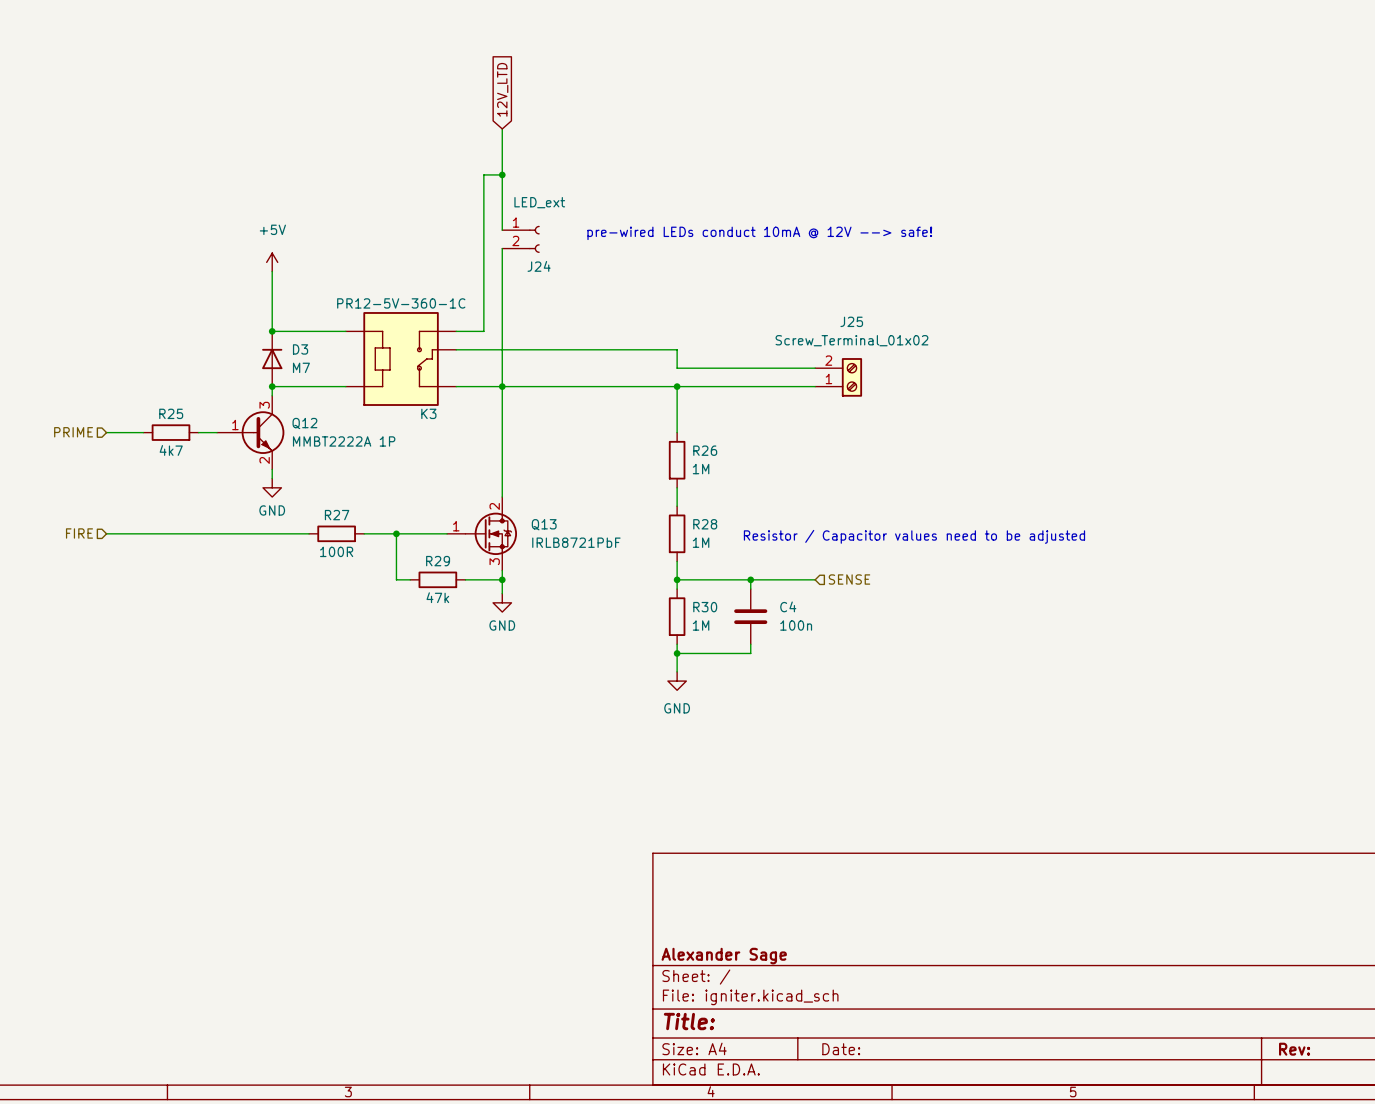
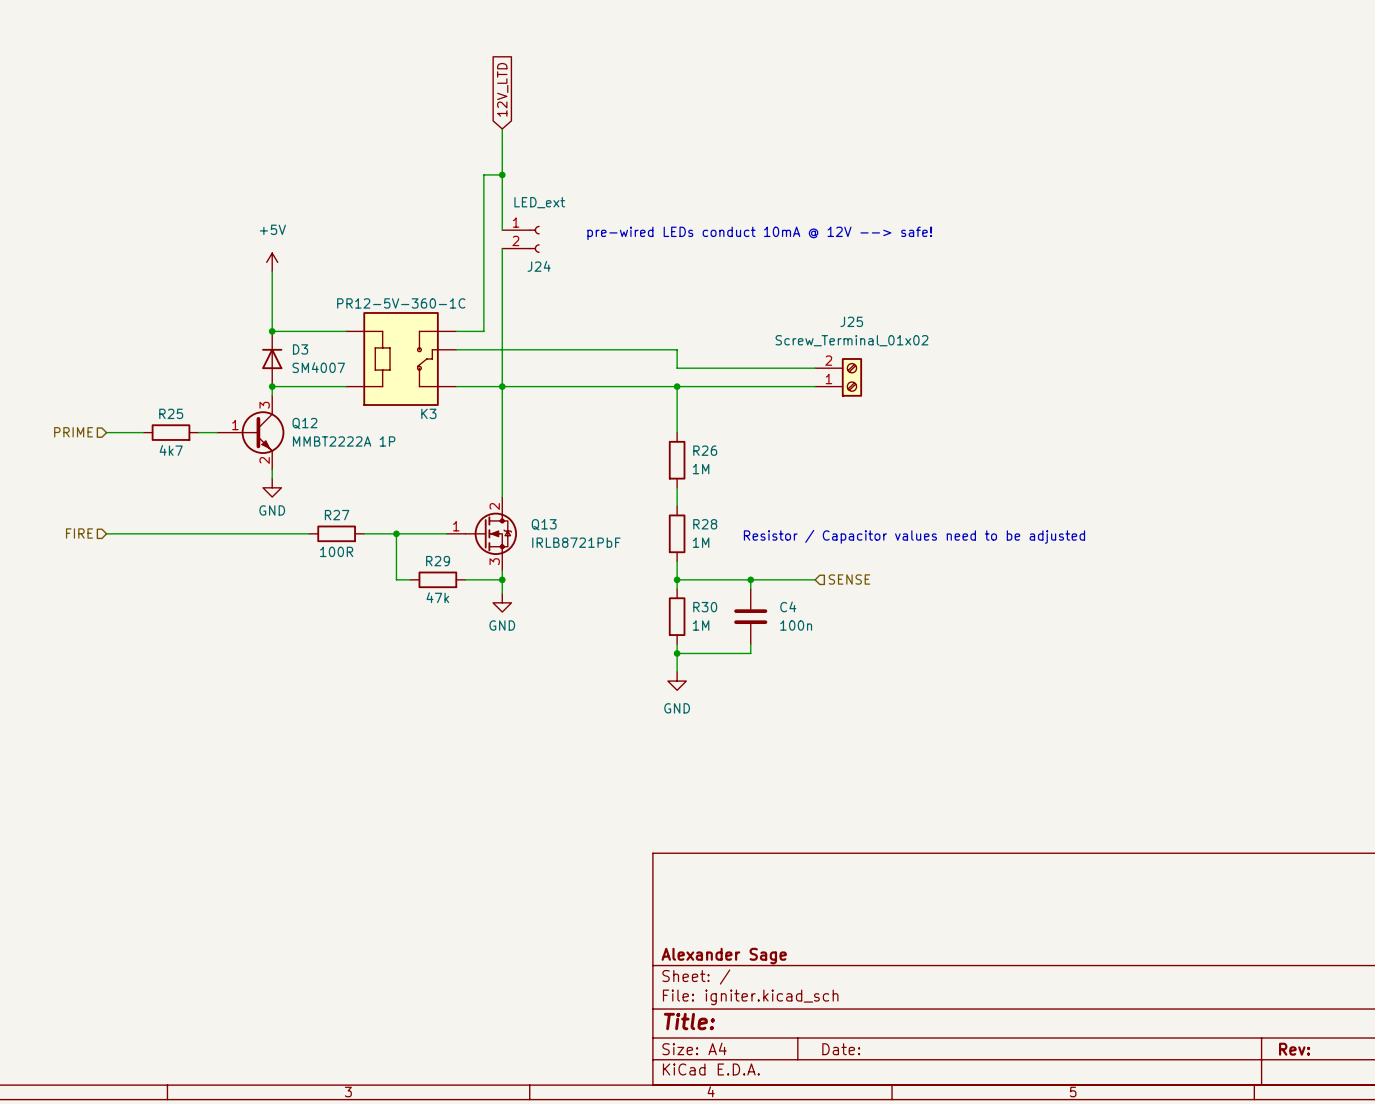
D3 value: M7 (301, 367) -> SM4007 (318, 367)

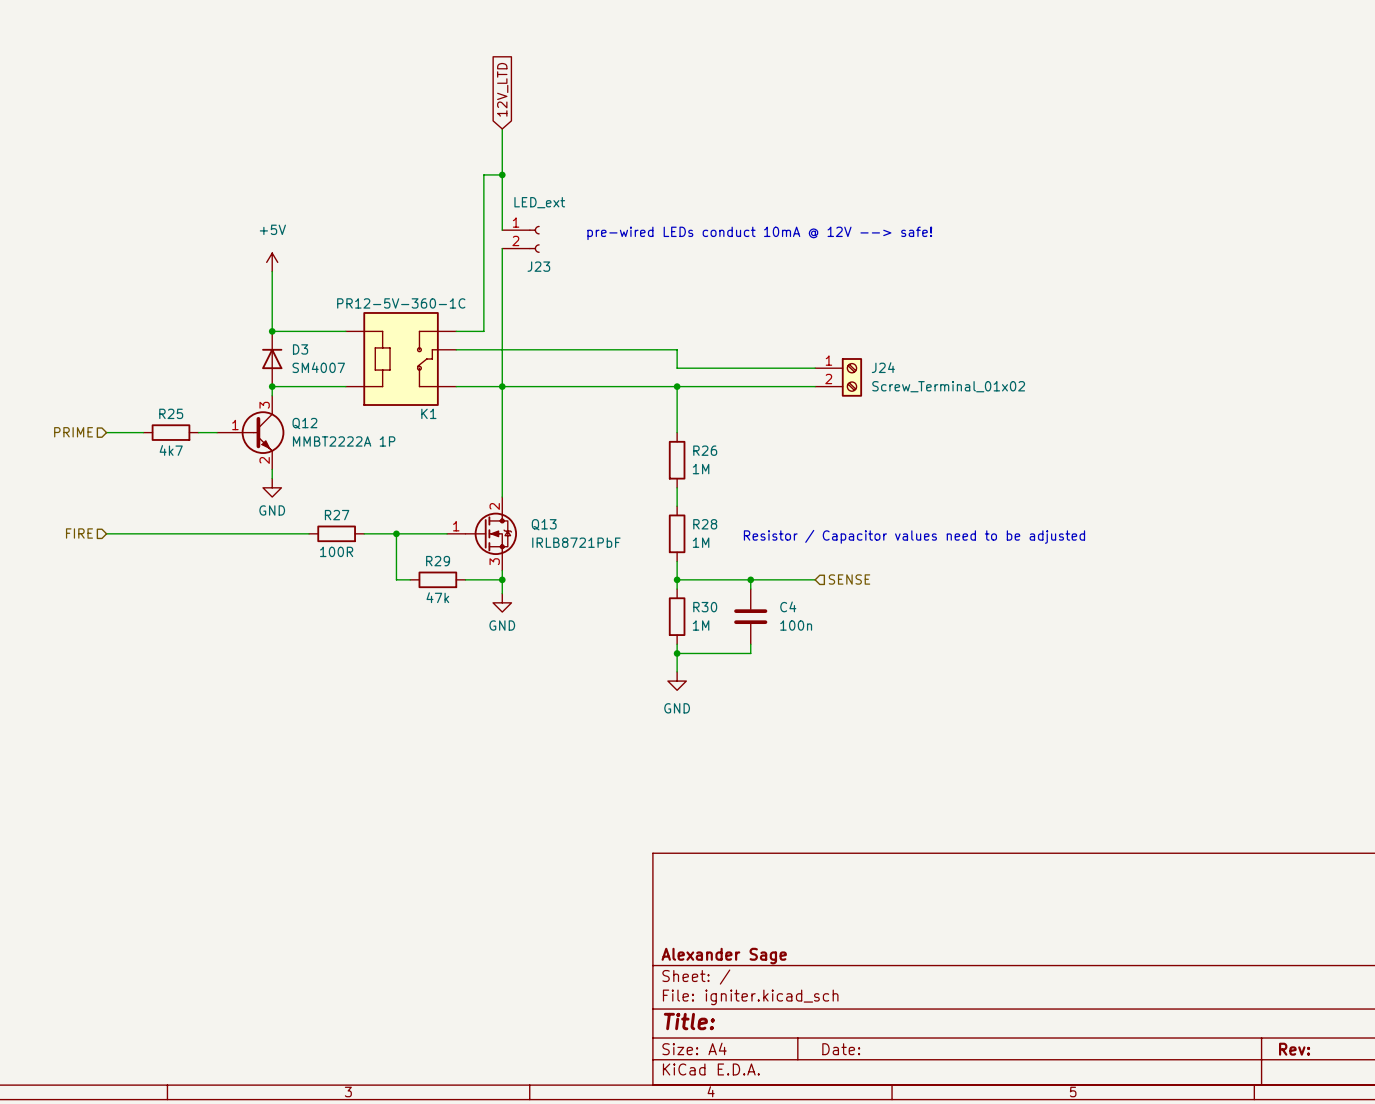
J24 name: J24 (539, 266) -> J23 (538, 266)
J25: Screw_Terminal_01x02 (838, 377) -> none
J24: none -> Screw_Terminal_01x02 (838, 377)
K3 name: K3 (428, 413) -> K1 (428, 413)

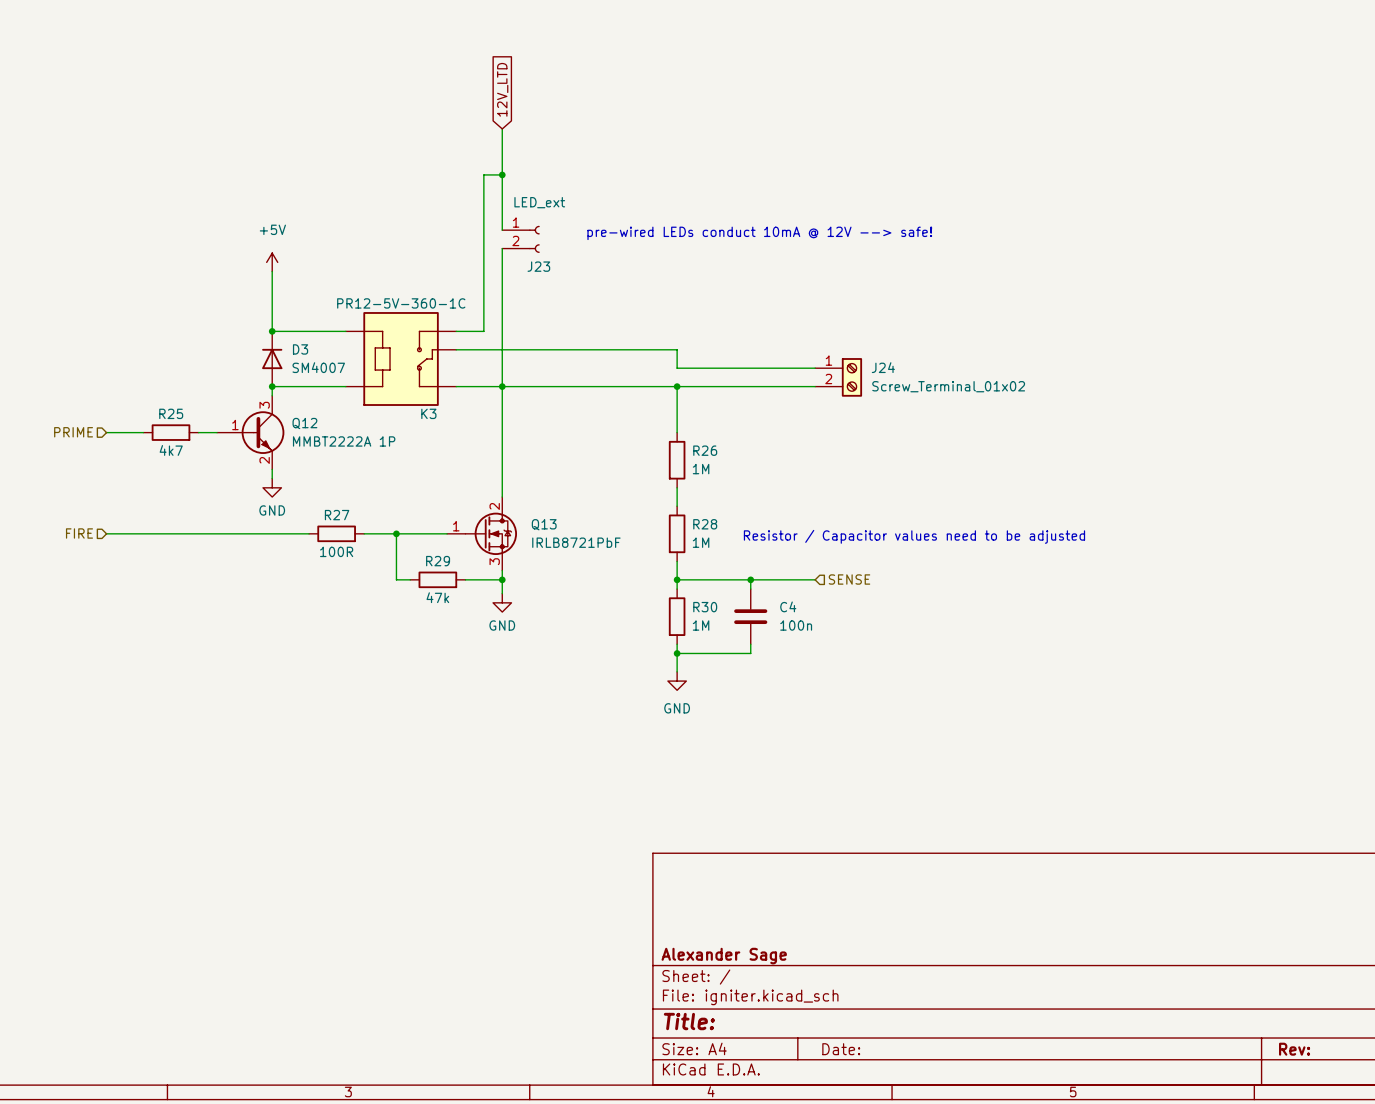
K1 name: K1 (428, 413) -> K3 (428, 413)

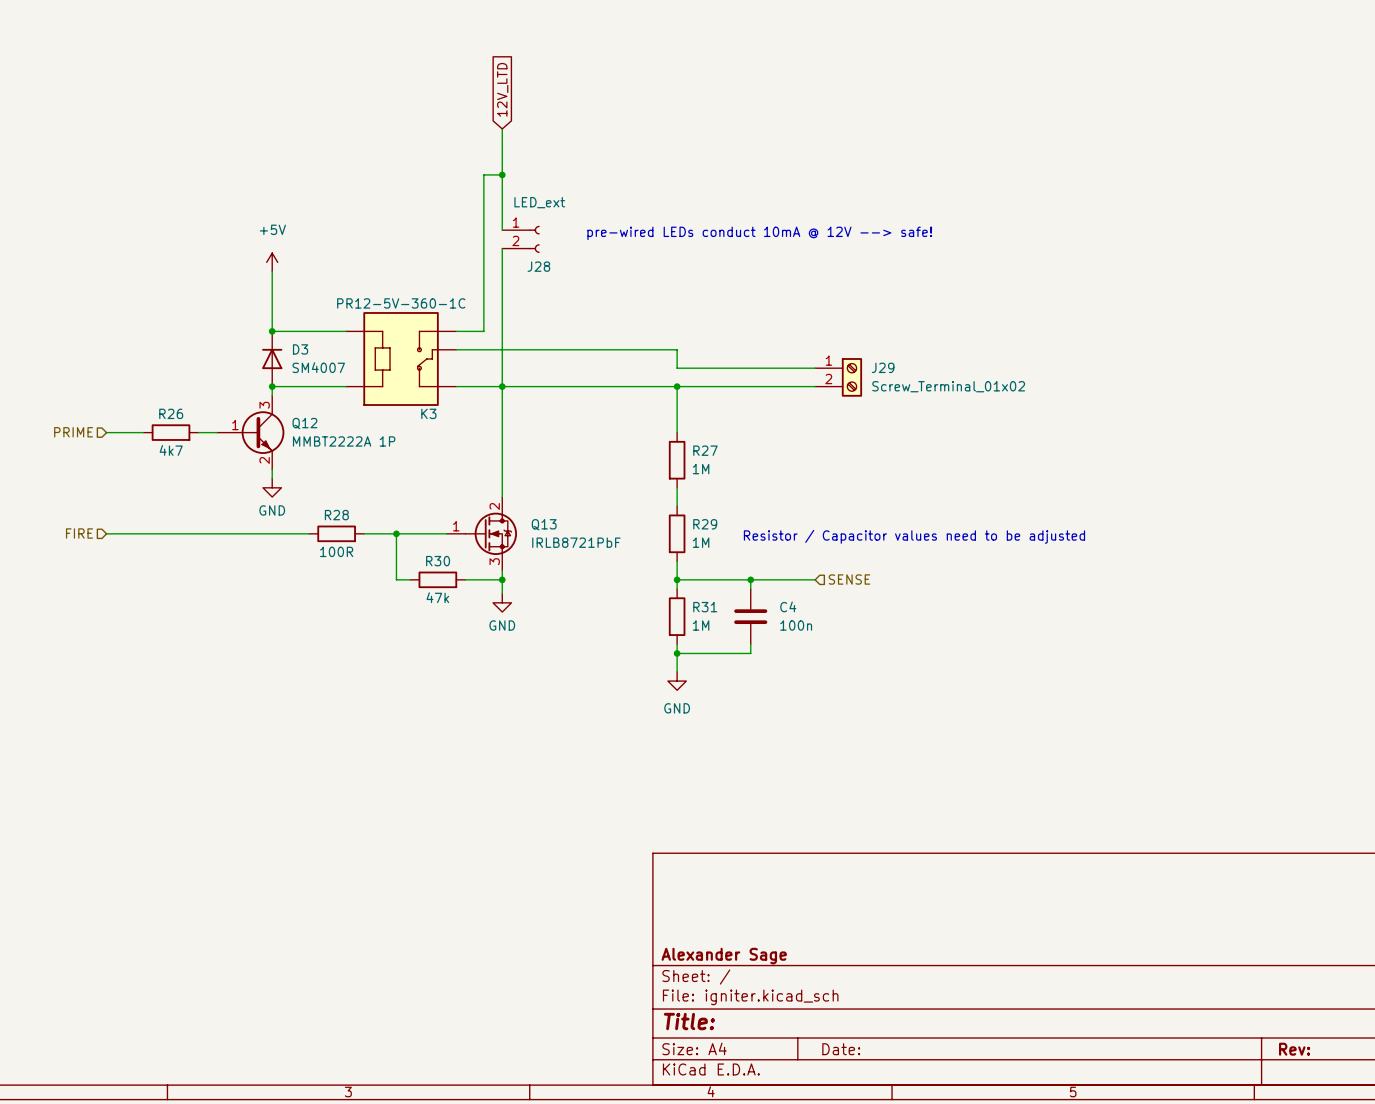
J23 name: J23 (538, 266) -> J28 (538, 266)
J24 name: J24 (883, 367) -> J29 (883, 367)
R25 name: R25 (171, 413) -> R26 (171, 413)
R26 name: R26 (705, 450) -> R27 (705, 450)
R27 name: R27 (337, 515) -> R28 (336, 515)
R28 name: R28 (705, 524) -> R29 (705, 524)
R29 name: R29 (438, 561) -> R30 (438, 561)
R30 name: R30 (705, 607) -> R31 (705, 607)

